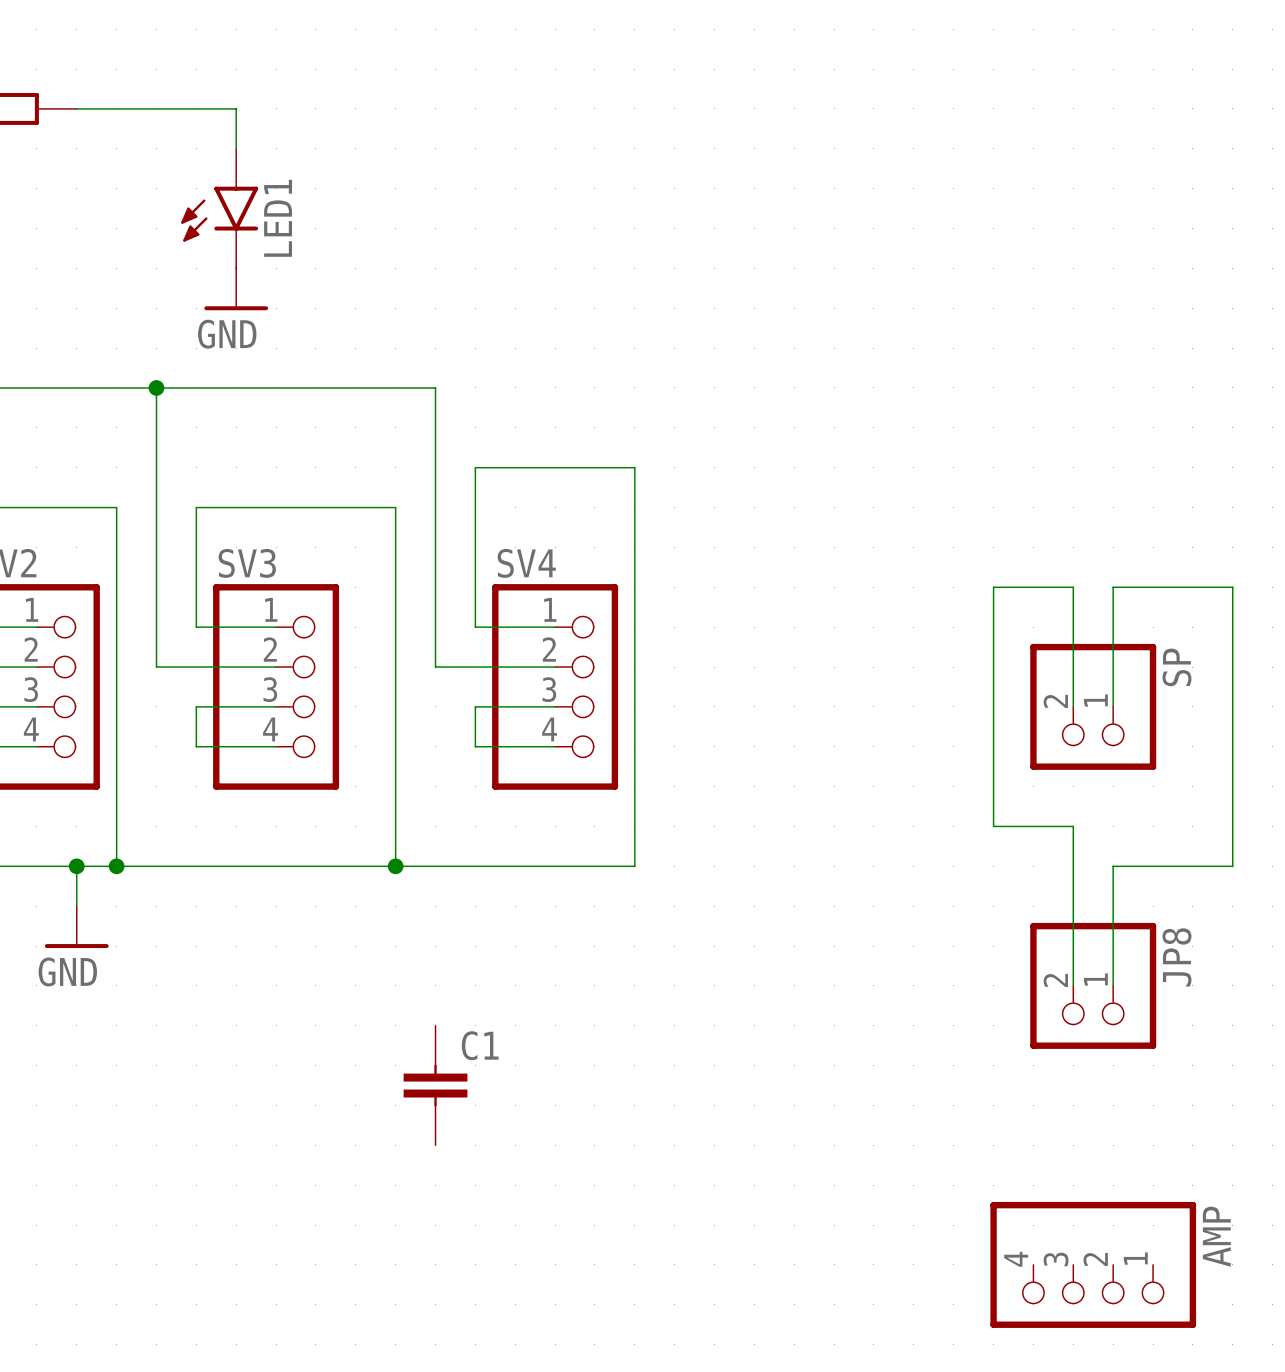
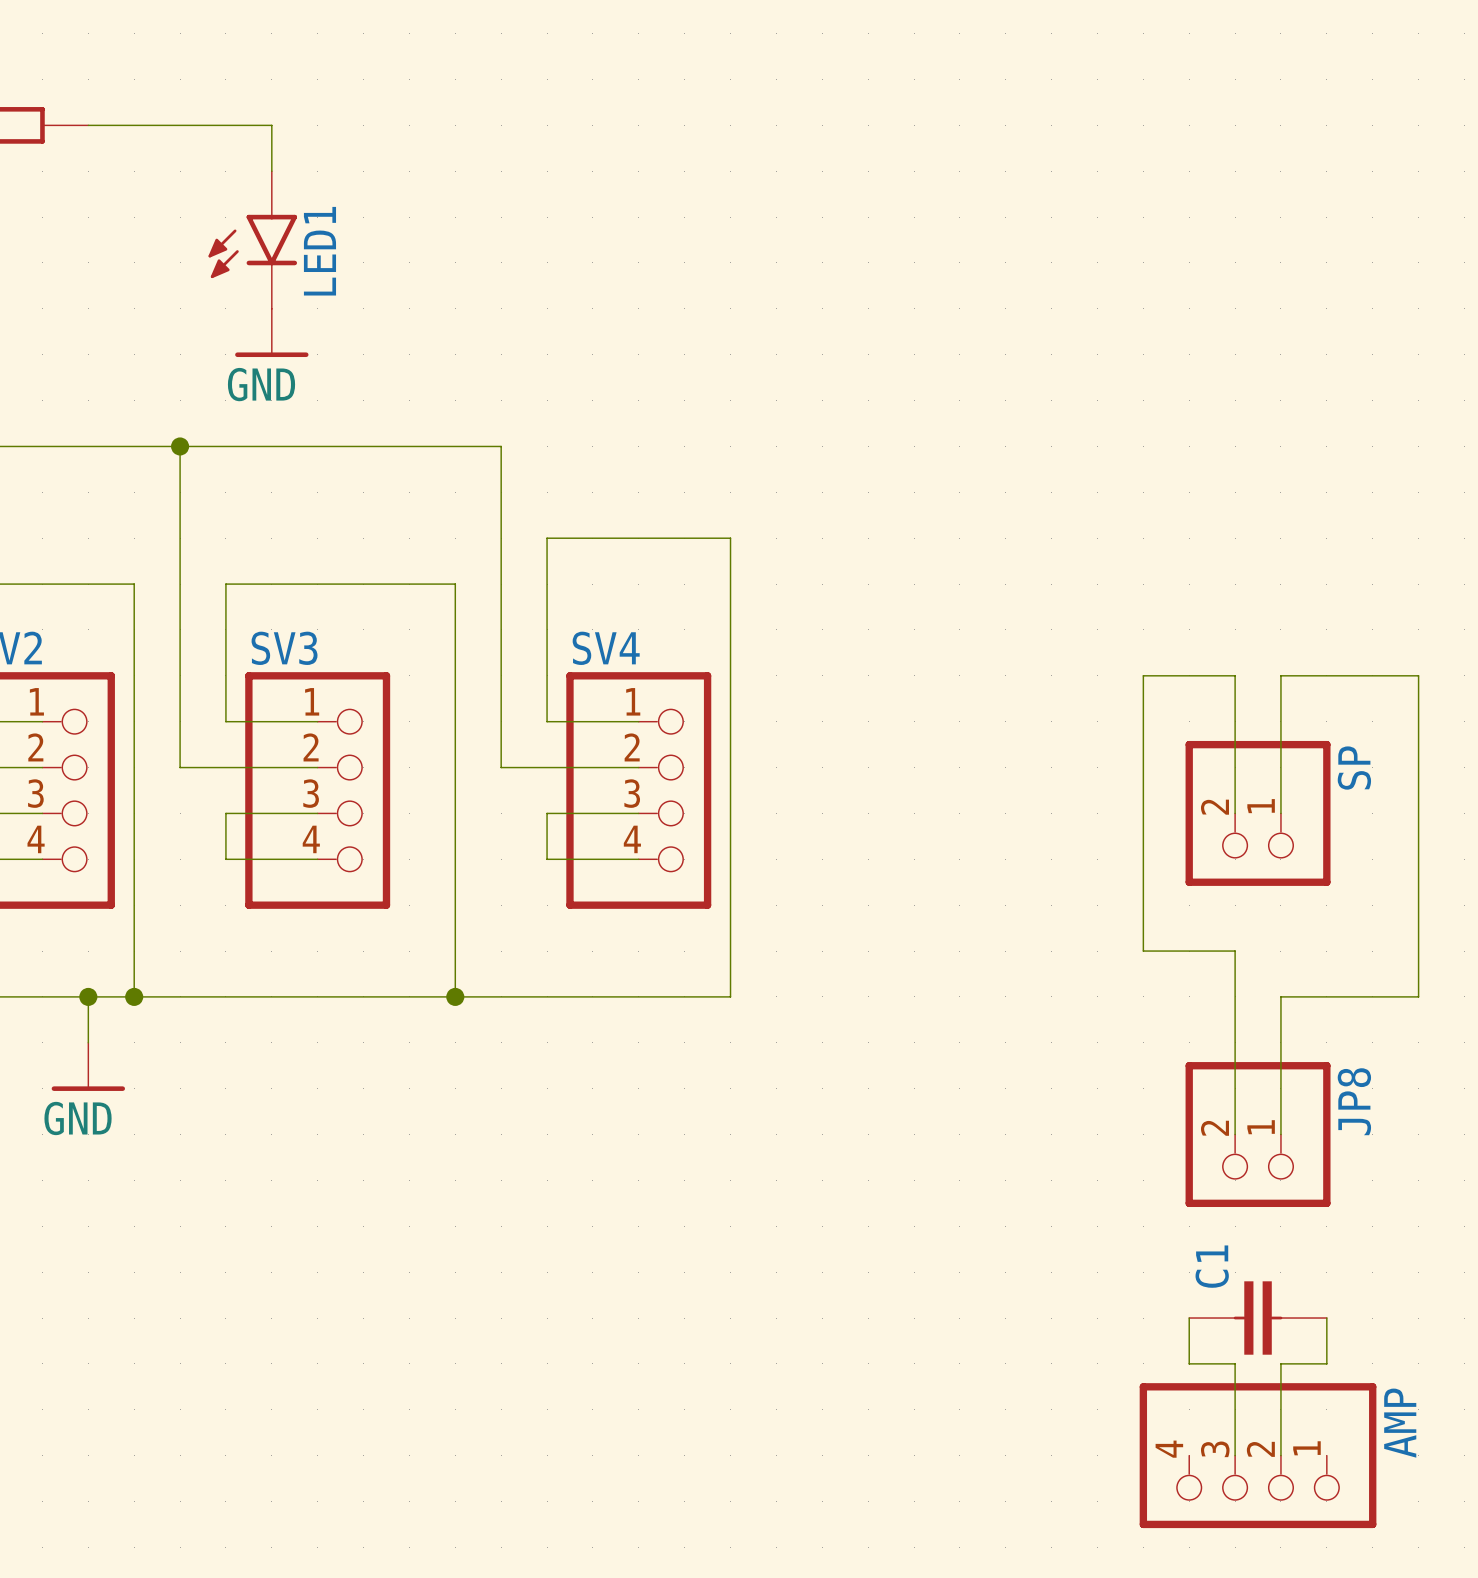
C1 name position: C1 (480, 1045) -> C1 (1212, 1266)
C1 rotation: 0° (435, 1085) -> 90° clockwise (1258, 1318)
C1 position: (435, 1085) -> (1258, 1318)
wire: none -> (1189, 1318) (1189, 1363) (1235, 1363) (1235, 1455)
wire: none -> (1326, 1318) (1326, 1363) (1280, 1363) (1280, 1455)

